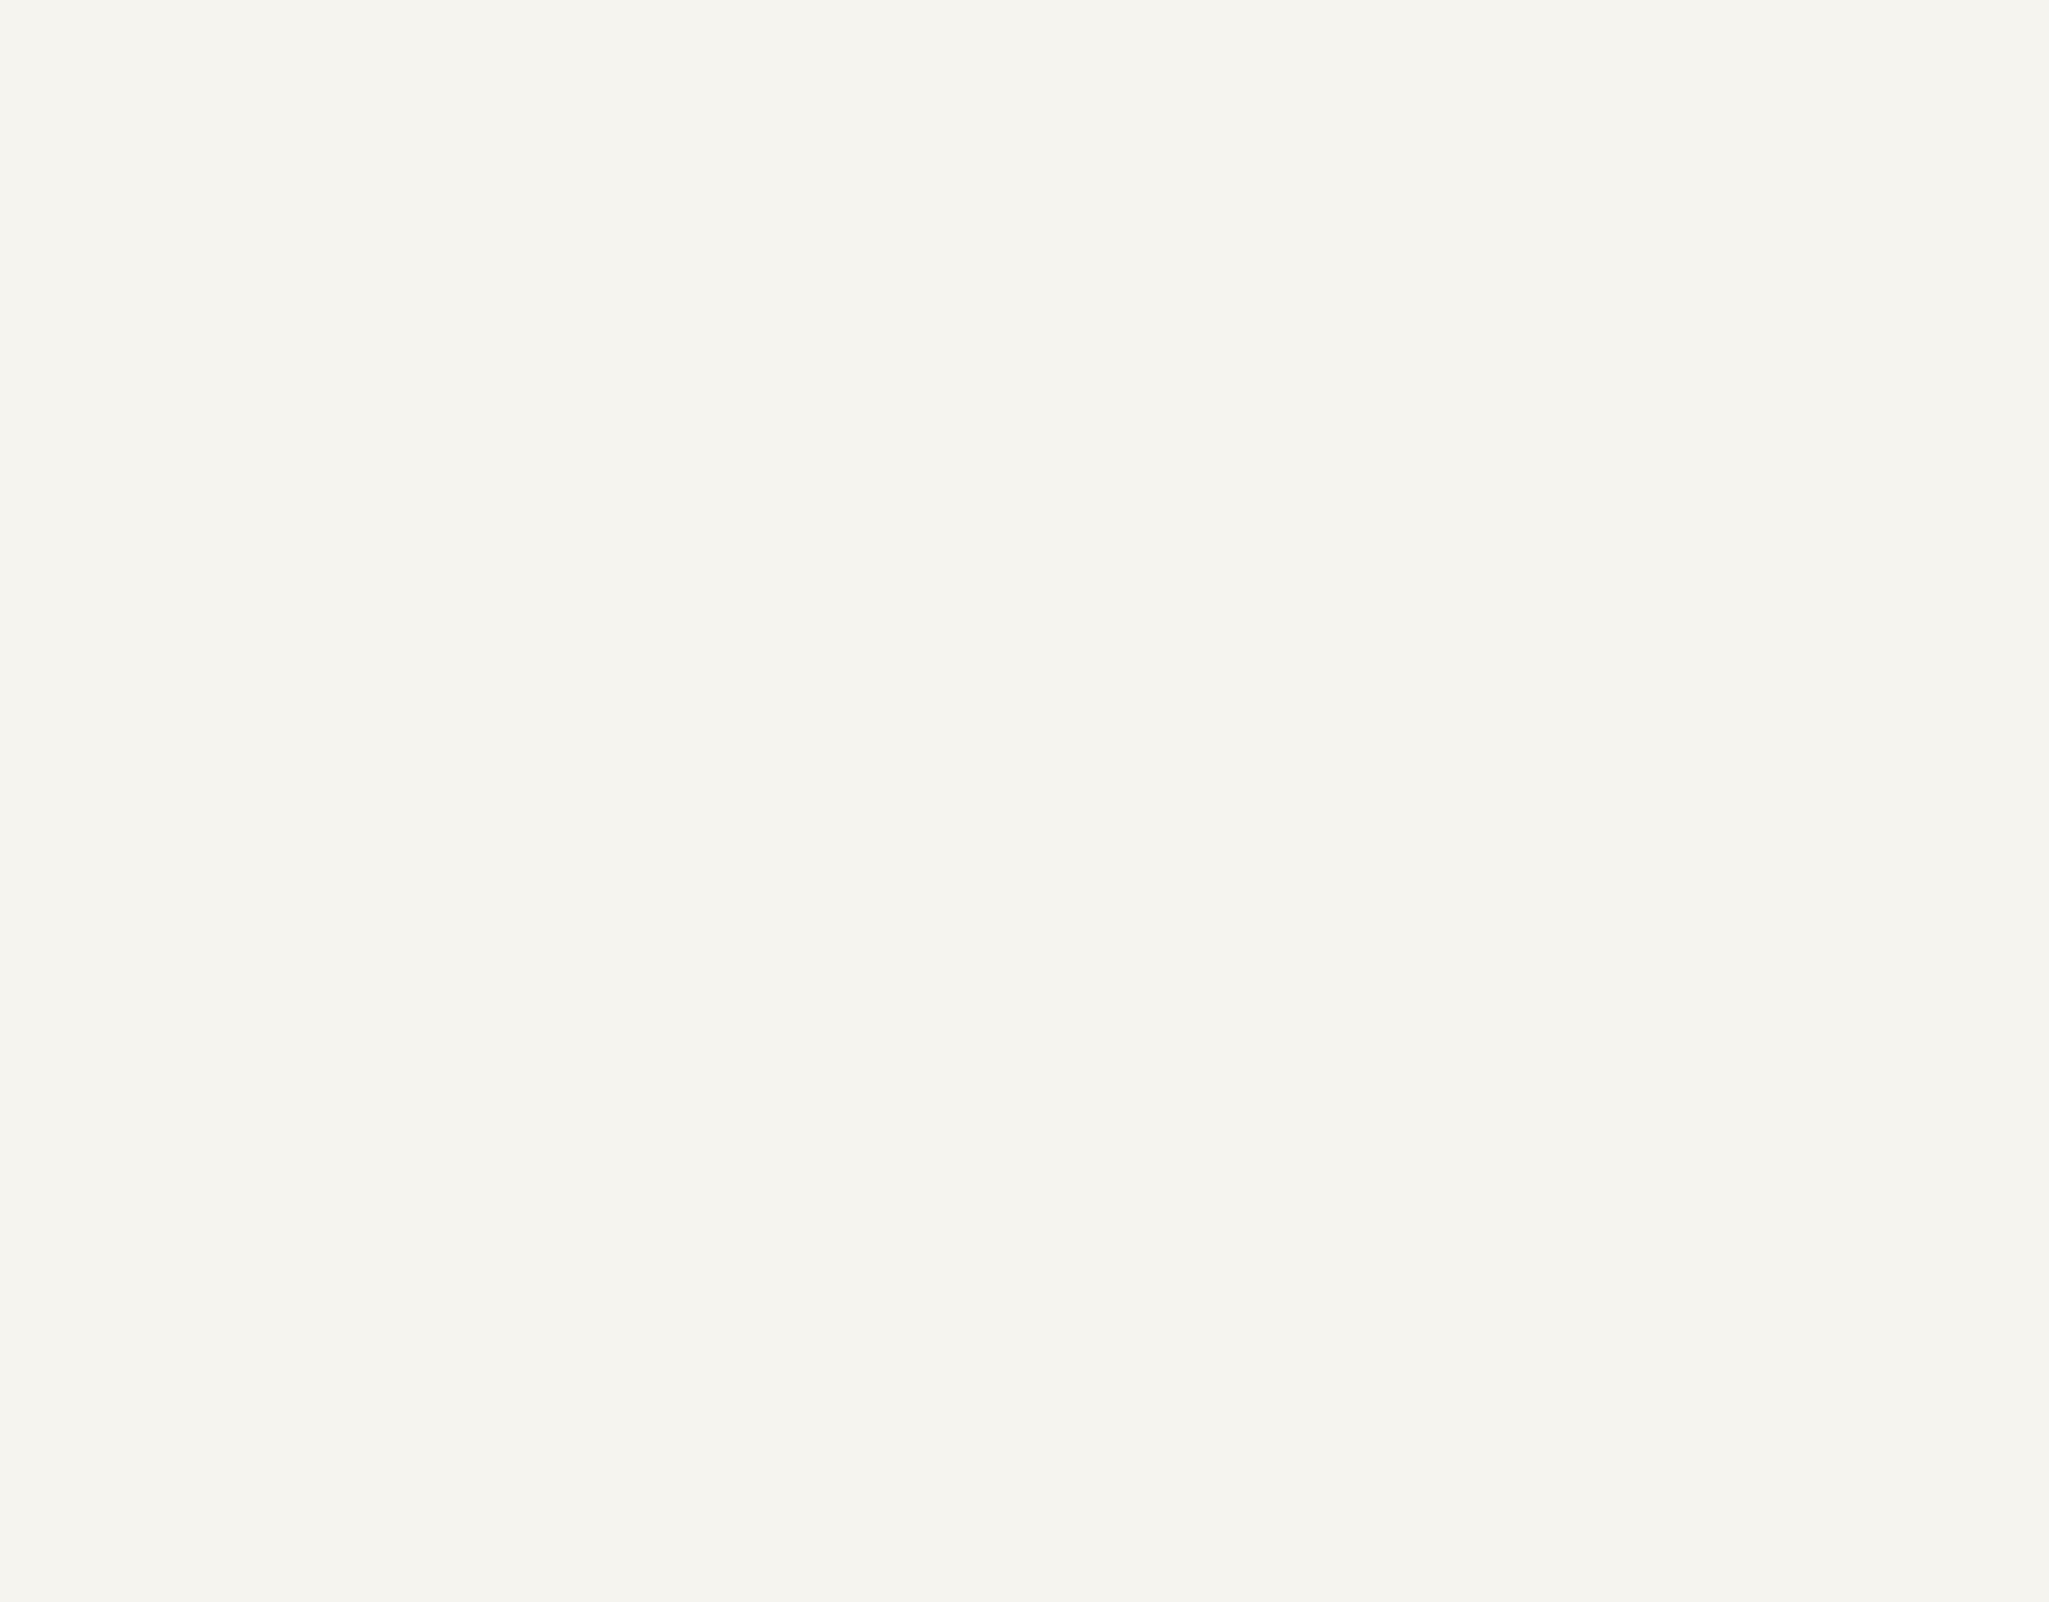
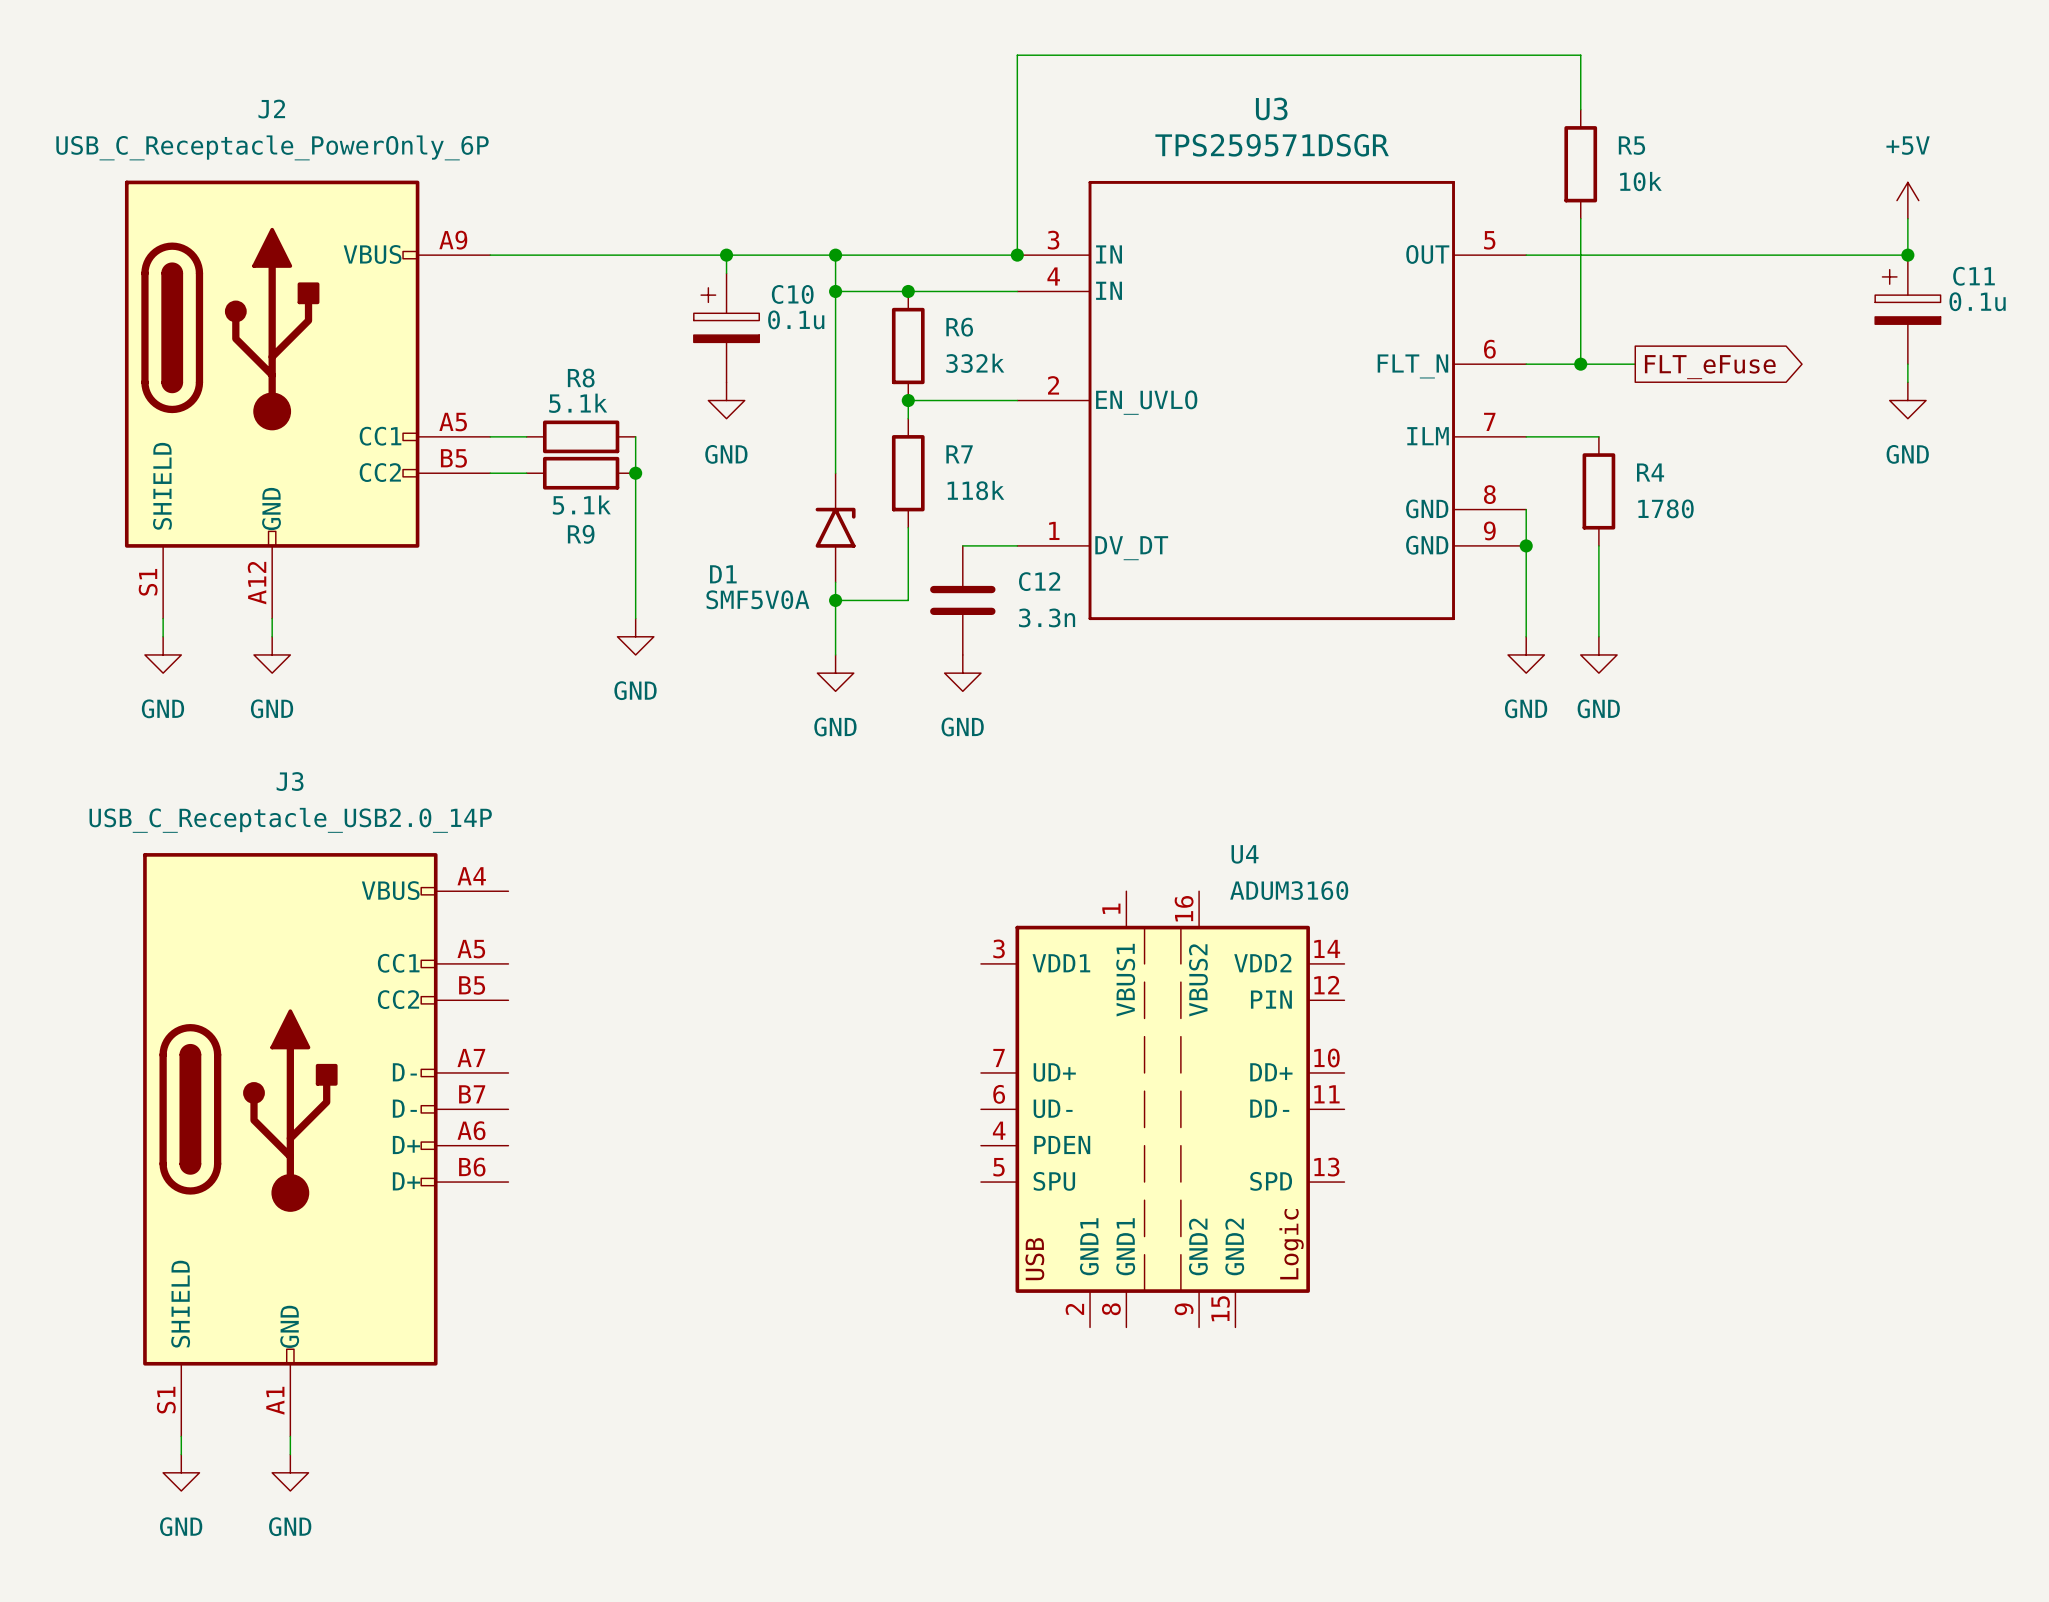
wire: none -> (1580, 109) (1580, 55) (1017, 55) (1017, 255) (490, 255)
R5: none -> 10k (1580, 164)
power symbol: none -> +5V (1907, 200)
wire: none -> (1580, 218) (1580, 364)
wire: none -> (1907, 218) (1907, 255) (1526, 255)
wire: none -> (726, 255) (726, 273)
junction: none -> (726, 255)
wire: none -> (835, 255) (835, 473)
junction: none -> (835, 255)
junction: none -> (1017, 255)
junction: none -> (1907, 255)
wire: none -> (835, 291) (1017, 291)
junction: none -> (835, 291)
junction: none -> (908, 291)
C11: none -> 0.1u (1907, 309)
C10: none -> 0.1u (726, 327)
R6: none -> 332k (908, 346)
wire: none -> (1526, 364) (1635, 364)
junction: none -> (1580, 364)
wire: none -> (1907, 364) (1907, 382)
global label: none -> FLT_eFuse (1710, 367)
J2: none -> USB_C_Receptacle_PowerOnly_6P (307, 399)
power symbol: none -> GND (726, 400)
junction: none -> (908, 400)
wire: none -> (1017, 400) (908, 400) (908, 418)
U3: none -> TPS259571DSGR (1271, 400)
power symbol: none -> GND (1907, 400)
wire: none -> (490, 436) (526, 436)
R8: none -> 5.1k (581, 436)
wire: none -> (635, 436) (635, 618)
wire: none -> (1526, 436) (1598, 436)
wire: none -> (490, 473) (526, 473)
R9: none -> 5.1k (581, 473)
junction: none -> (635, 473)
R7: none -> 118k (908, 473)
R4: none -> 1780 (1598, 491)
wire: none -> (1526, 509) (1526, 636)
D1: none -> SMF5V0A (835, 527)
wire: none -> (908, 527) (908, 600) (835, 600)
wire: none -> (962, 545) (1017, 545)
junction: none -> (1526, 545)
wire: none -> (1598, 545) (1598, 636)
wire: none -> (835, 582) (835, 654)
junction: none -> (835, 600)
C12: none -> 3.3n (962, 600)
wire: none -> (163, 618) (163, 636)
wire: none -> (272, 618) (272, 636)
power symbol: none -> GND (635, 636)
power symbol: none -> GND (163, 654)
power symbol: none -> GND (272, 654)
power symbol: none -> GND (1526, 654)
power symbol: none -> GND (1598, 654)
power symbol: none -> GND (835, 673)
power symbol: none -> GND (962, 673)
U4: none -> ADUM3160 (1162, 1109)
J3: none -> USB_C_Receptacle_USB2.0_14P (325, 1144)
wire: none -> (181, 1436) (181, 1454)
wire: none -> (290, 1436) (290, 1454)
power symbol: none -> GND (181, 1472)
power symbol: none -> GND (290, 1472)

